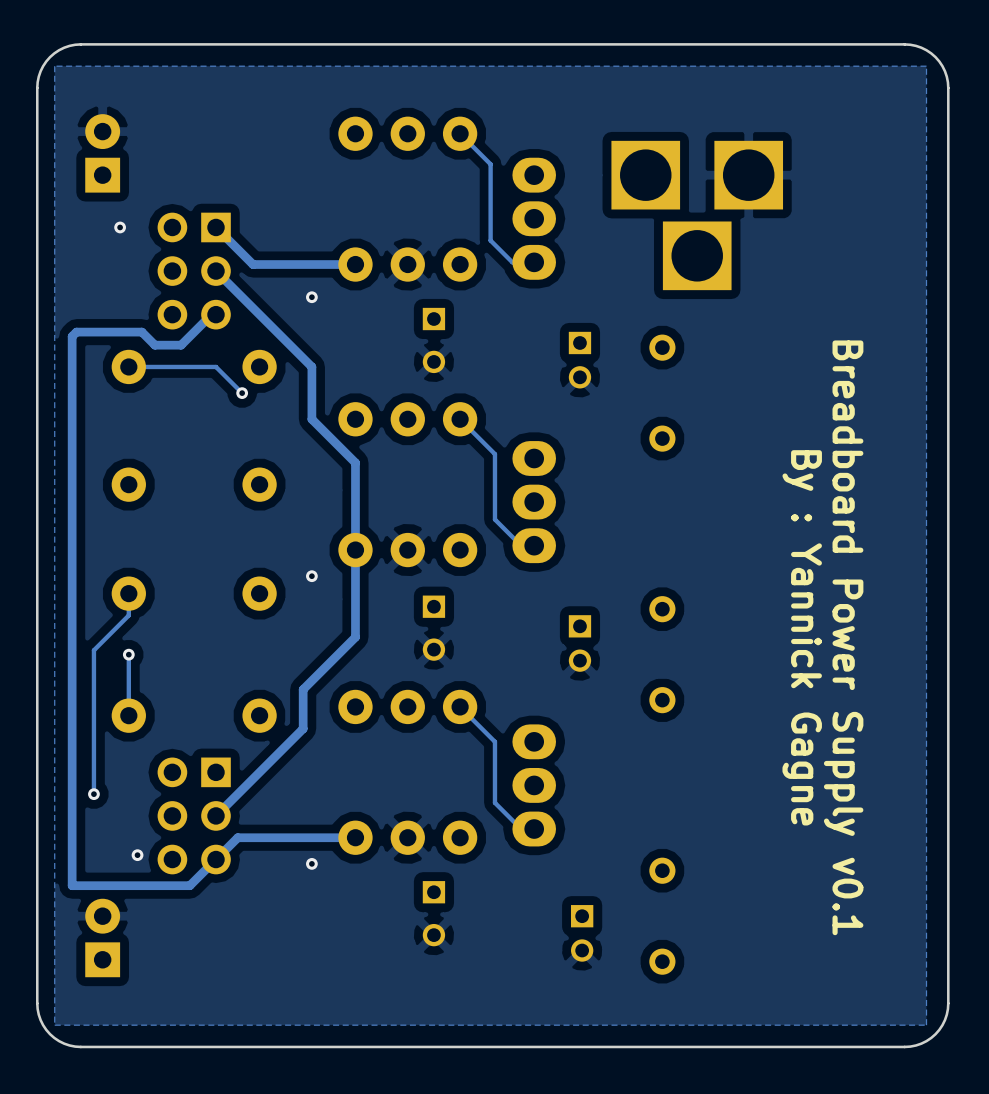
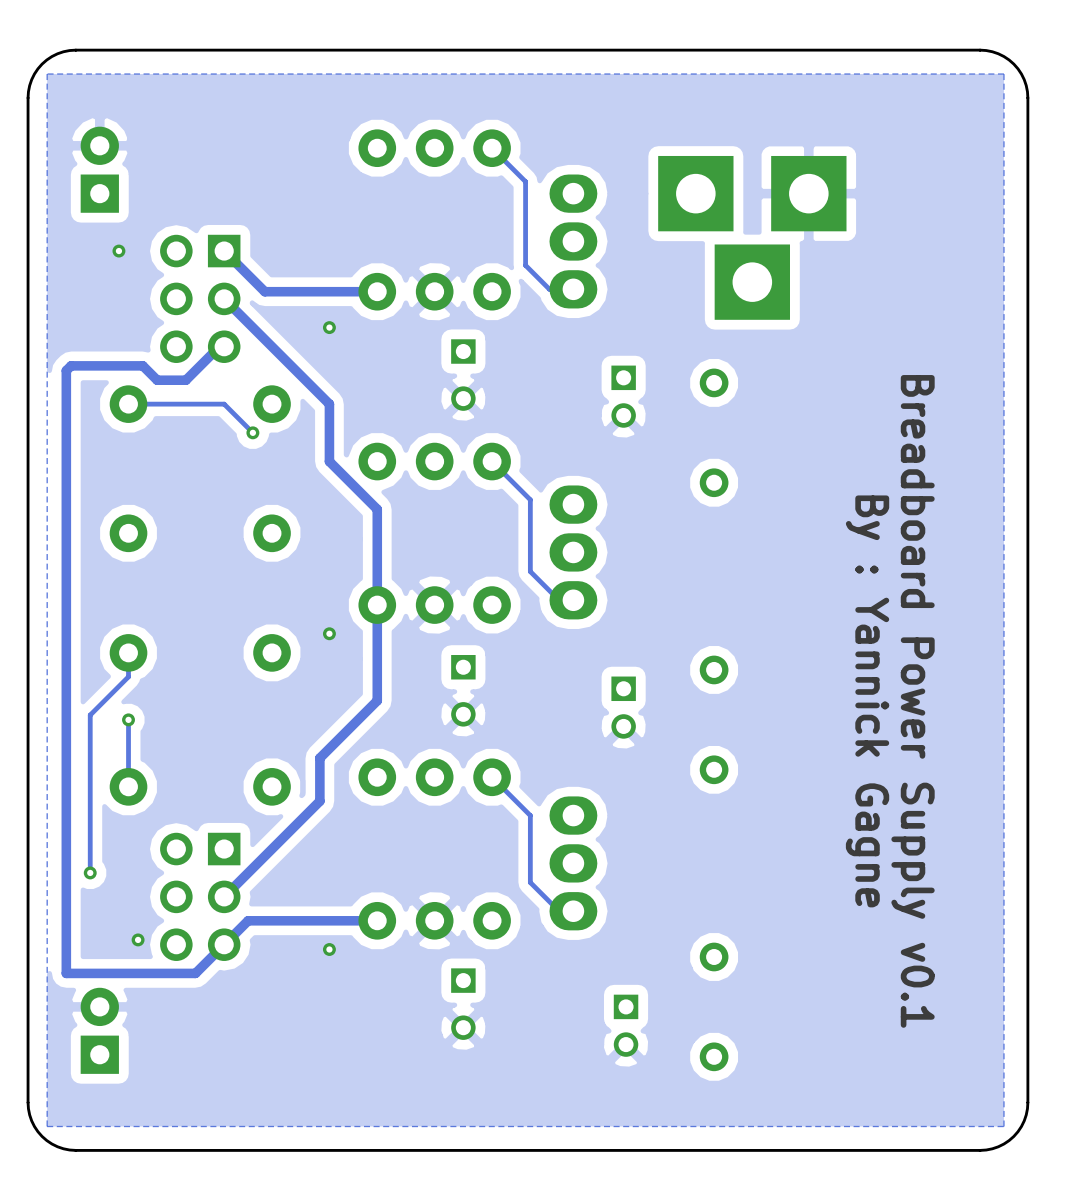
part footprint: [611, 140, 784, 291] -> [658, 155, 847, 320]

